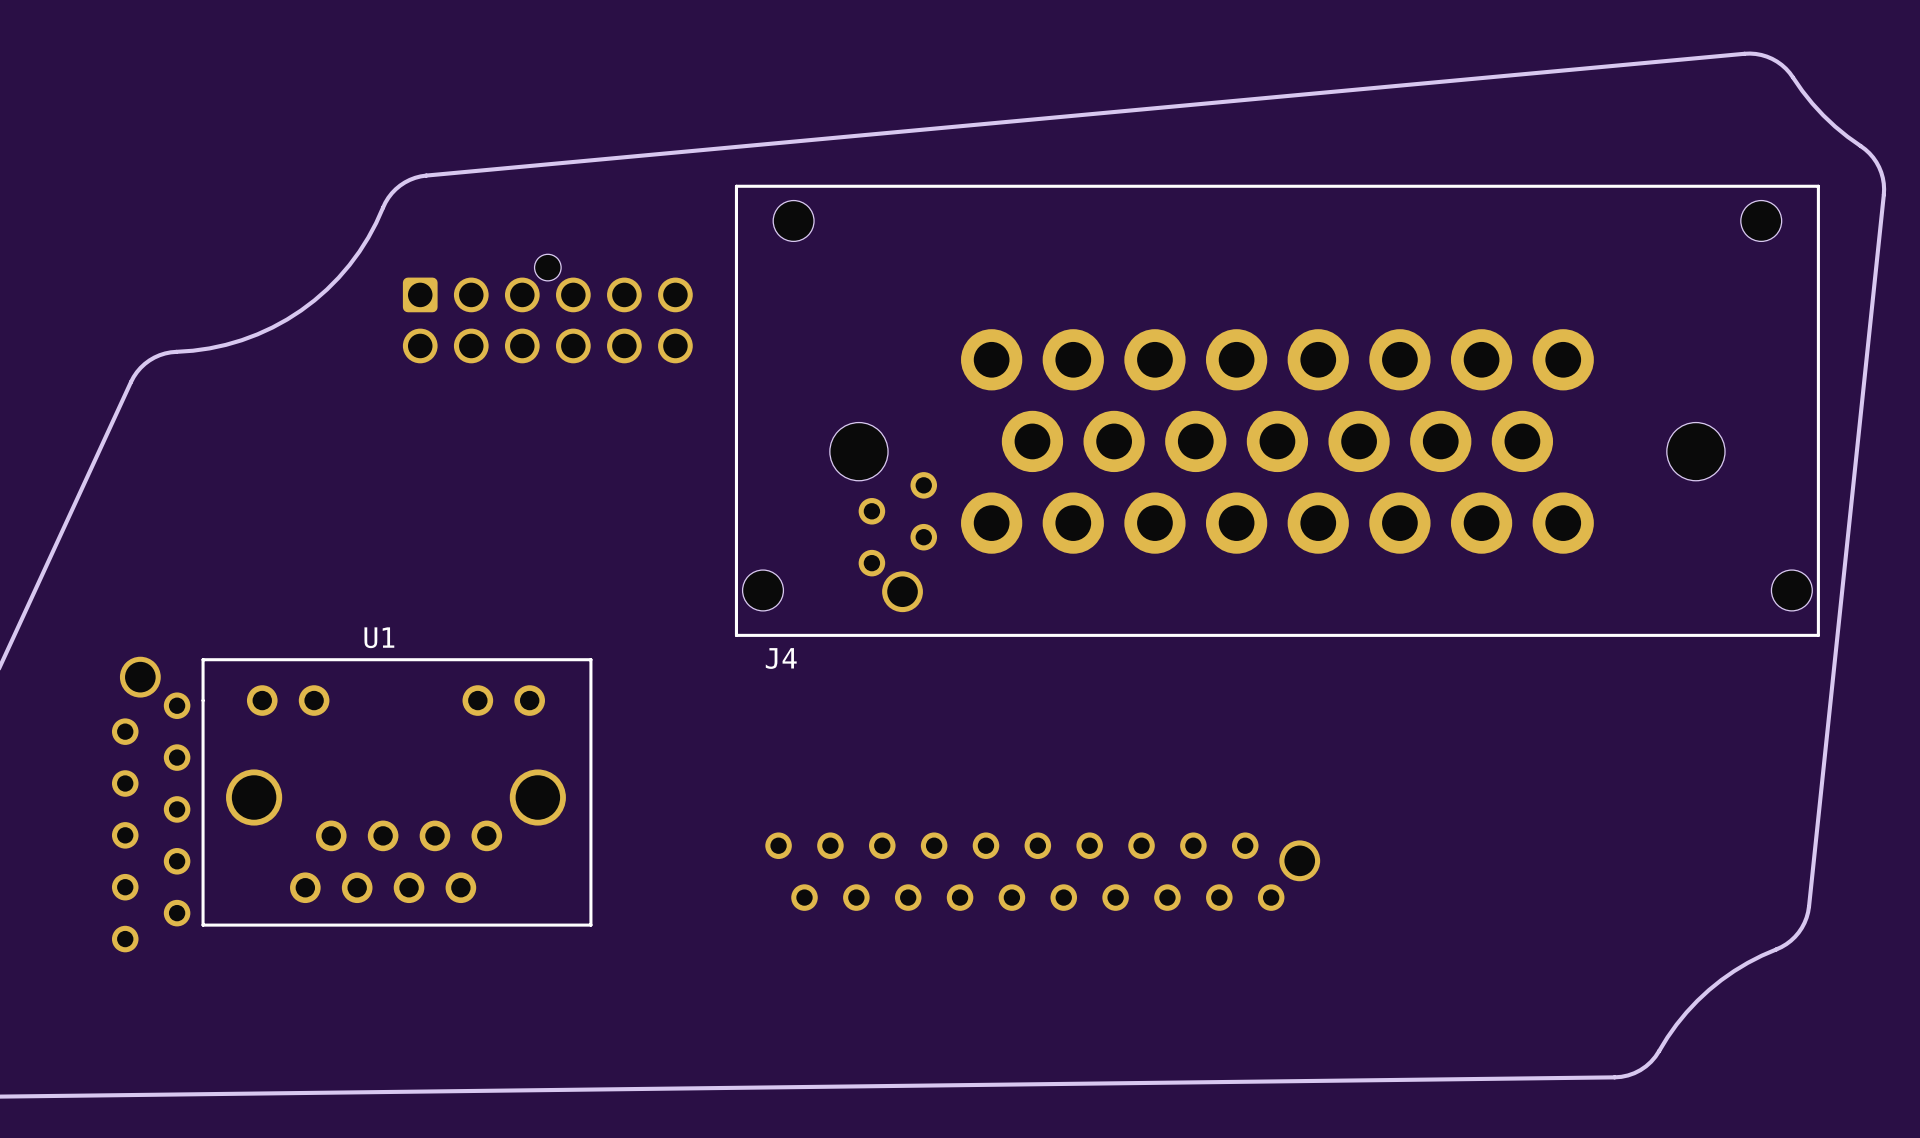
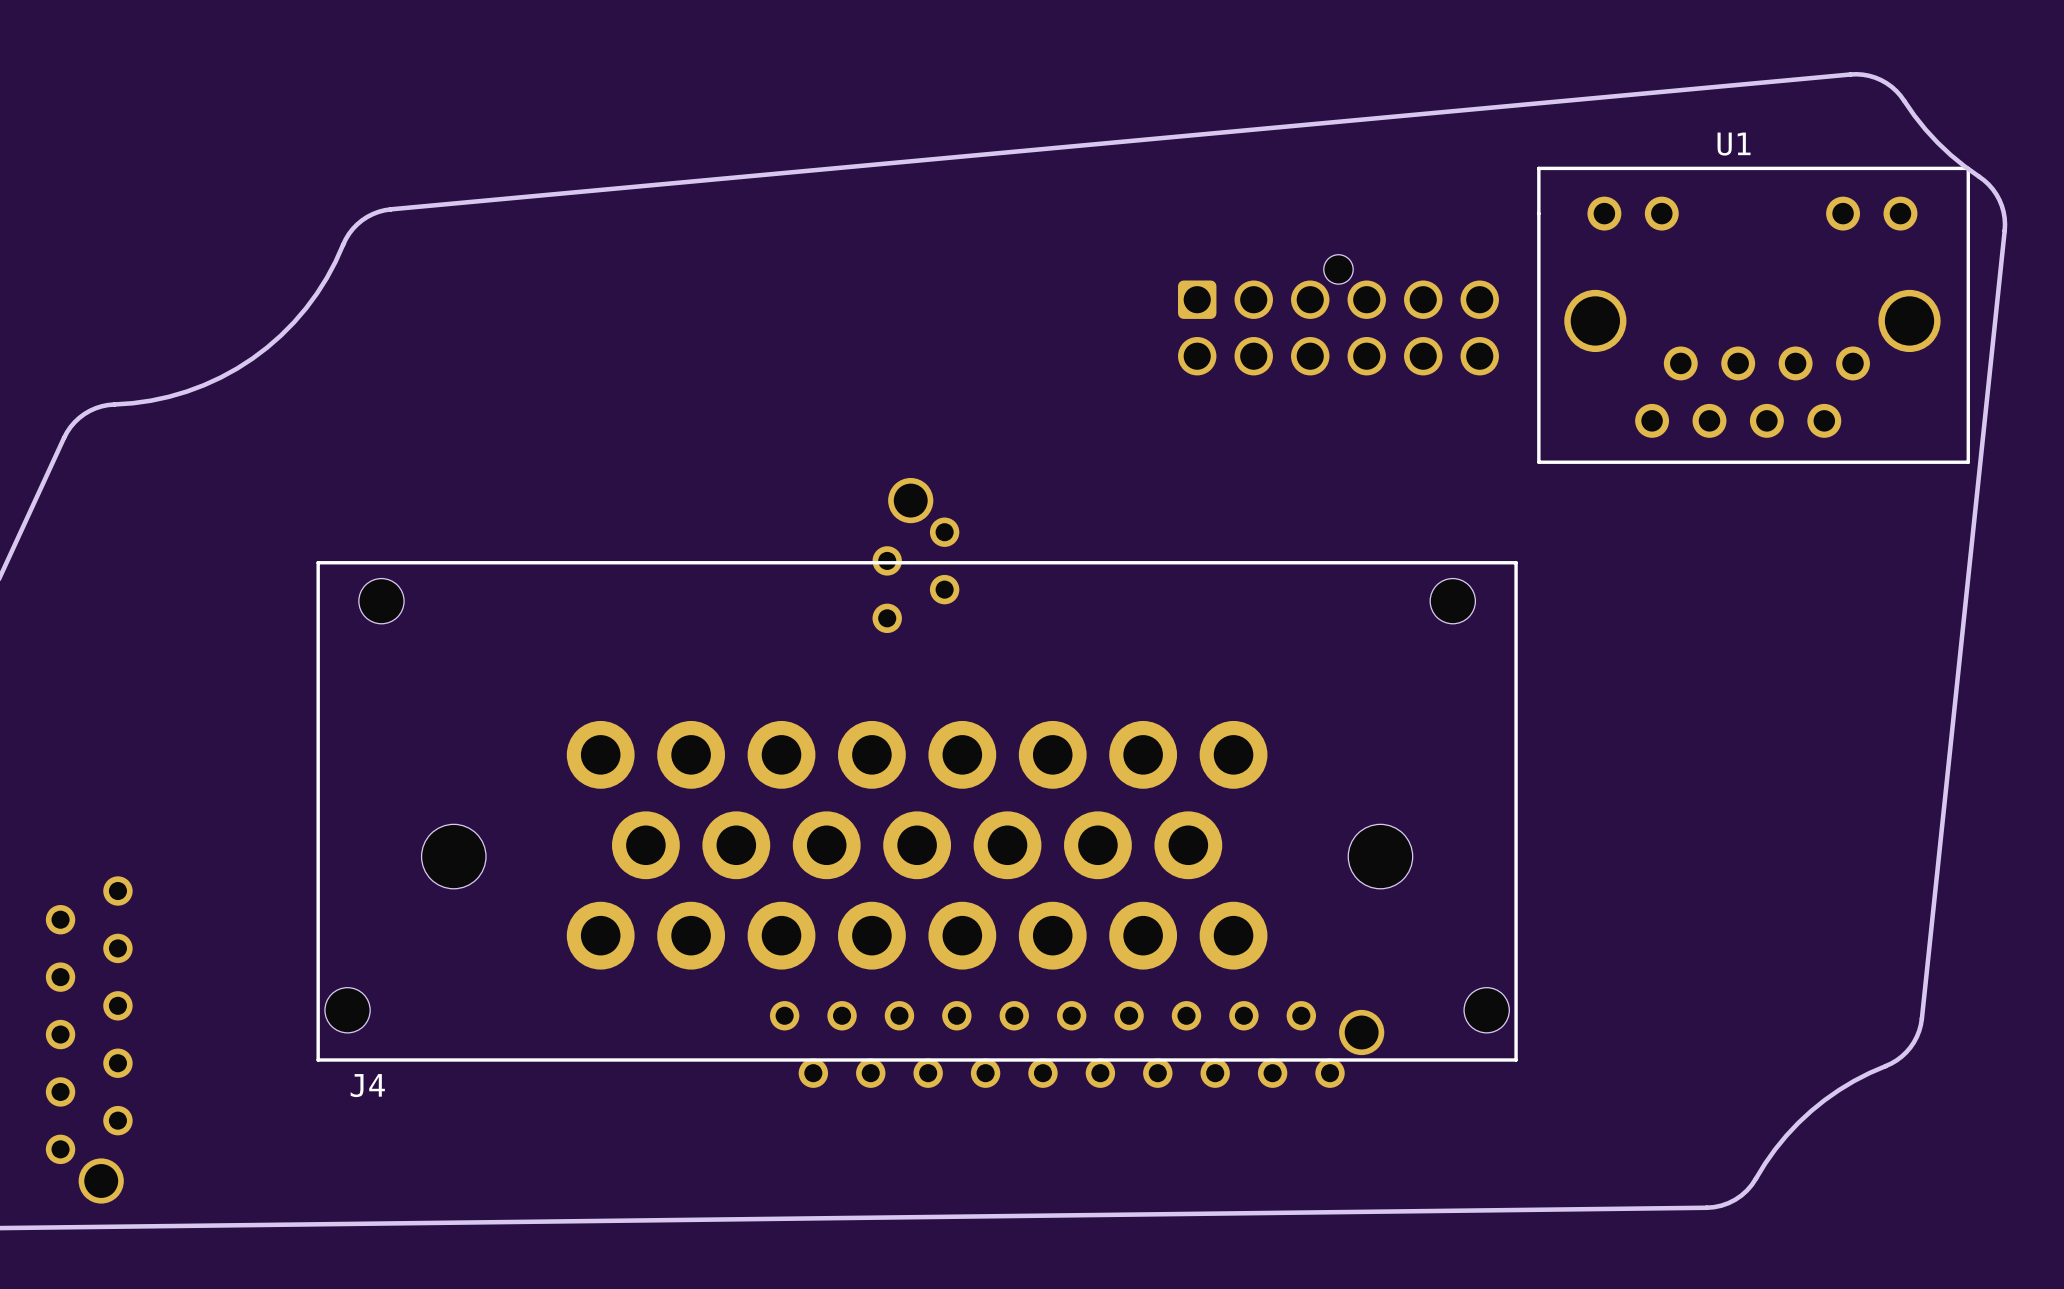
part: none -> (1338, 315)
part: (547, 308) -> none
J4 position: (1277, 410) -> (917, 811)
part rotation: 0° (897, 542) -> 180° (915, 555)
U1 position: (396, 792) -> (1753, 315)
part rotation: 0° (151, 804) -> 180° (89, 1039)
part position: (1042, 871) -> (1077, 1044)

